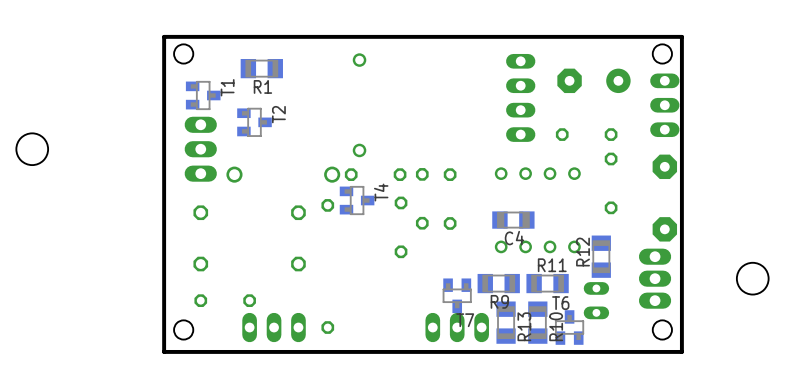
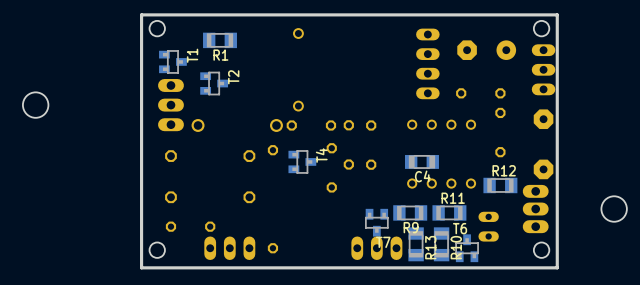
T4 position: (357, 200) -> (302, 161)
R12 rotation: 0° (601, 256) -> 90° clockwise (500, 185)

